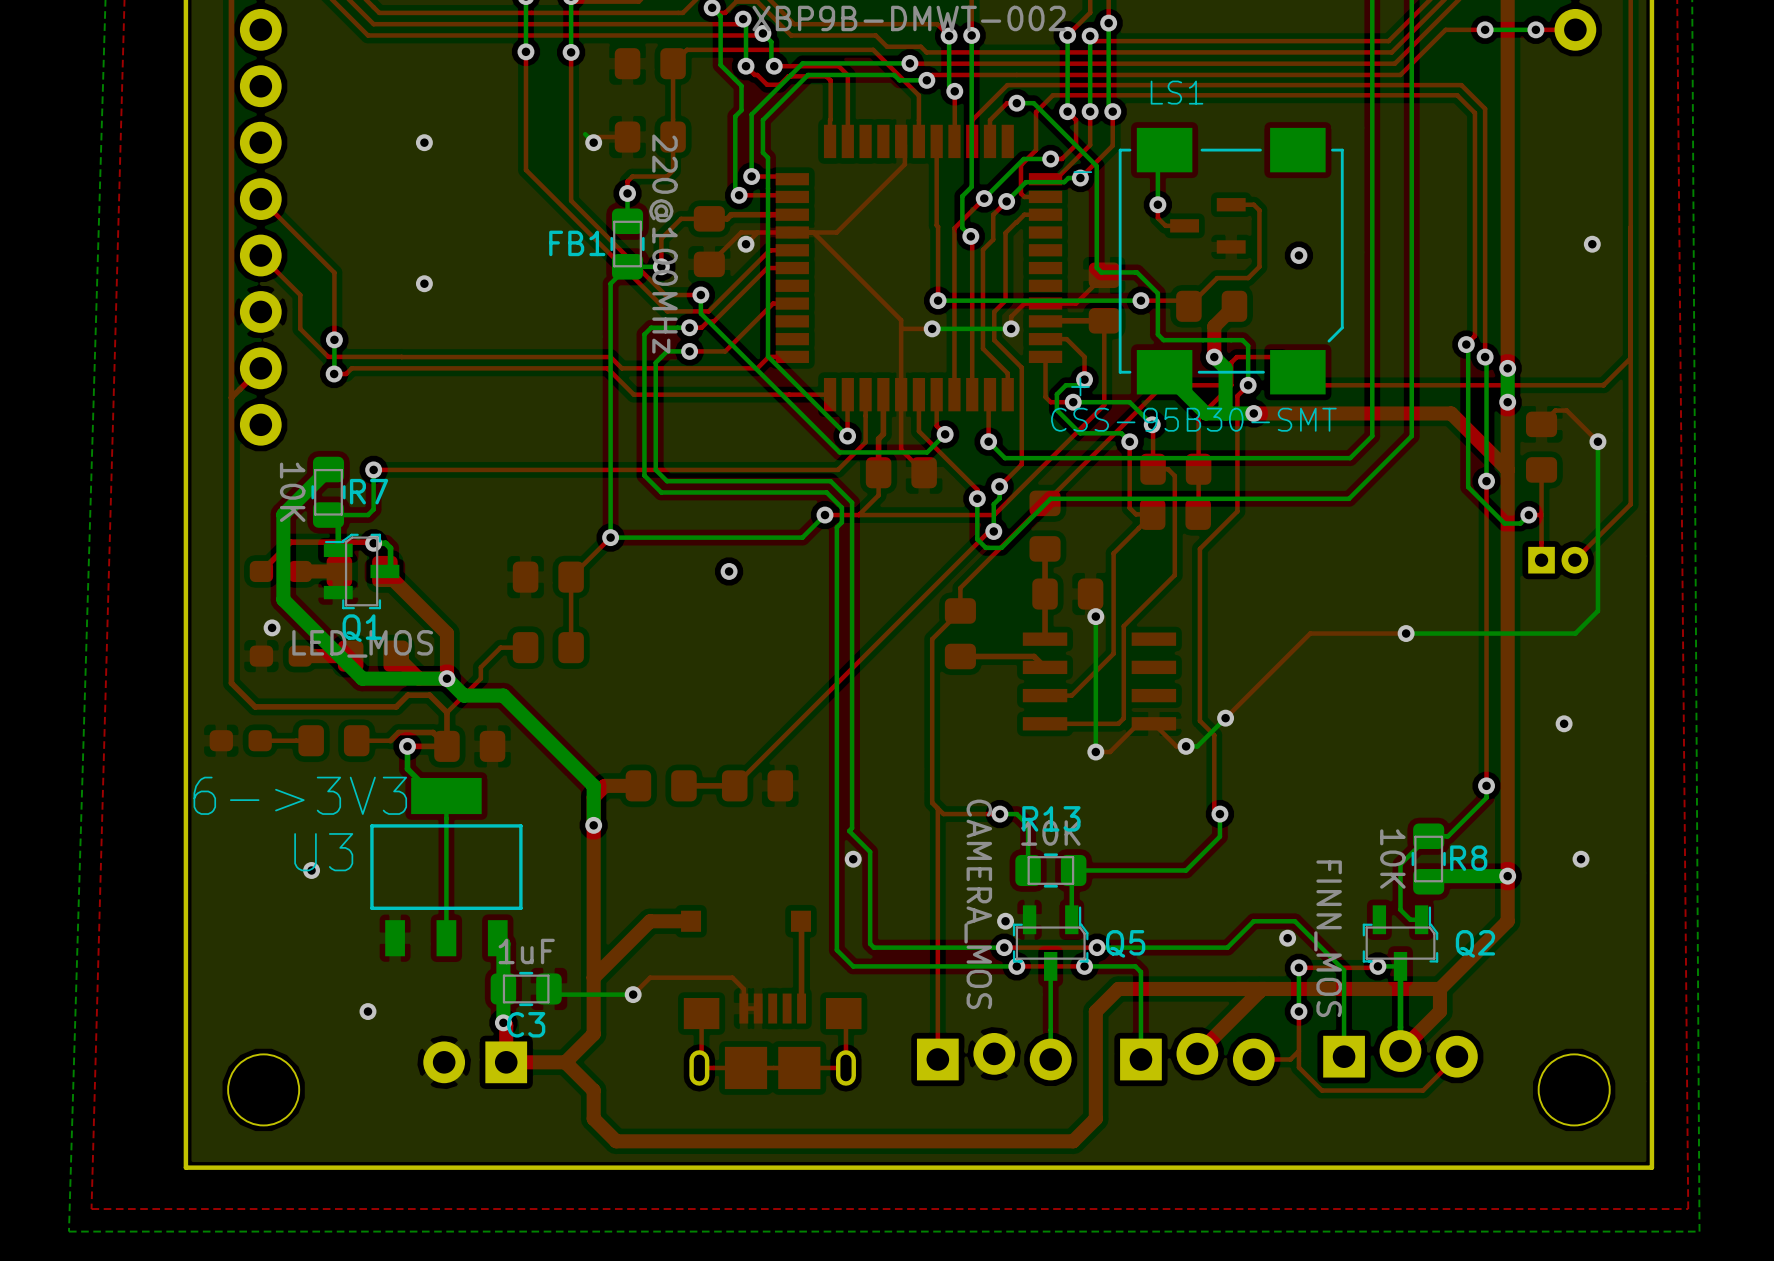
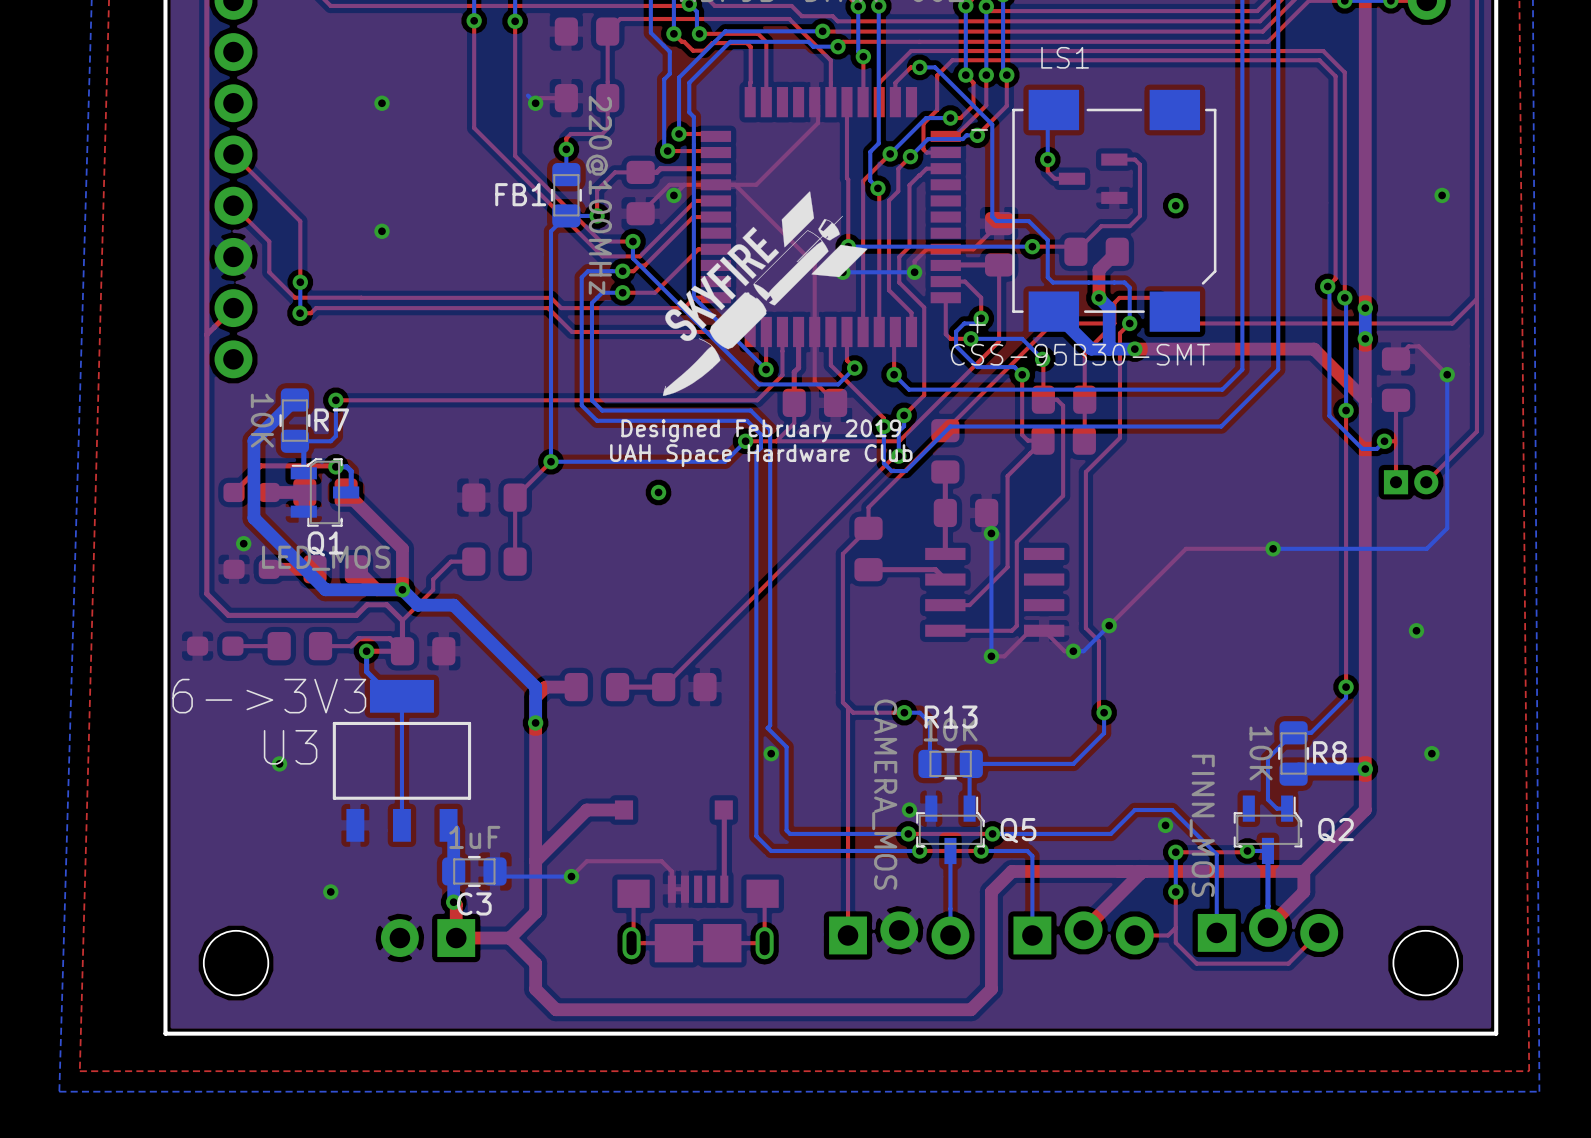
drawing: none -> [662, 191, 868, 396]
text: none -> Designed February 2019 (761, 430)
text: none -> UAH Space Hardware Club (761, 455)

